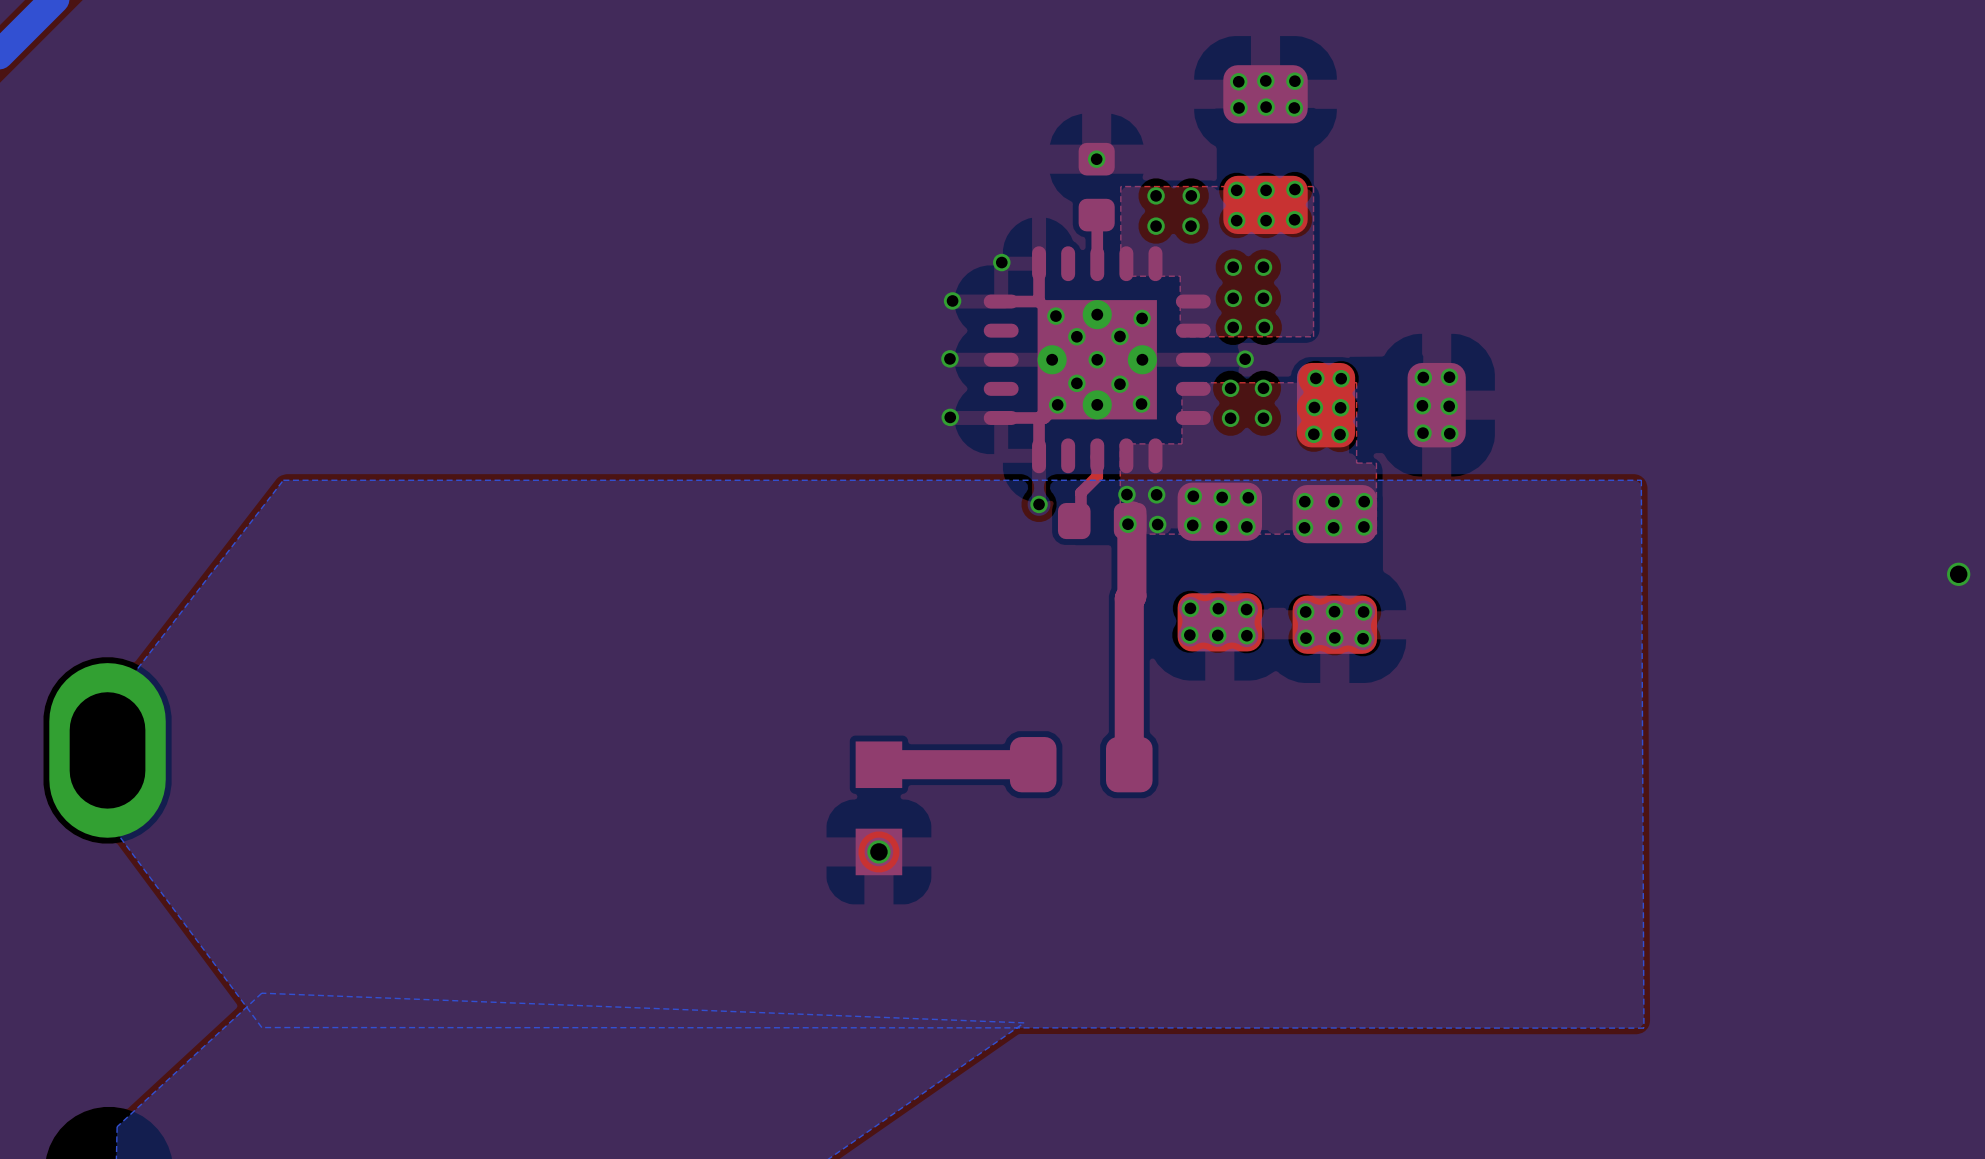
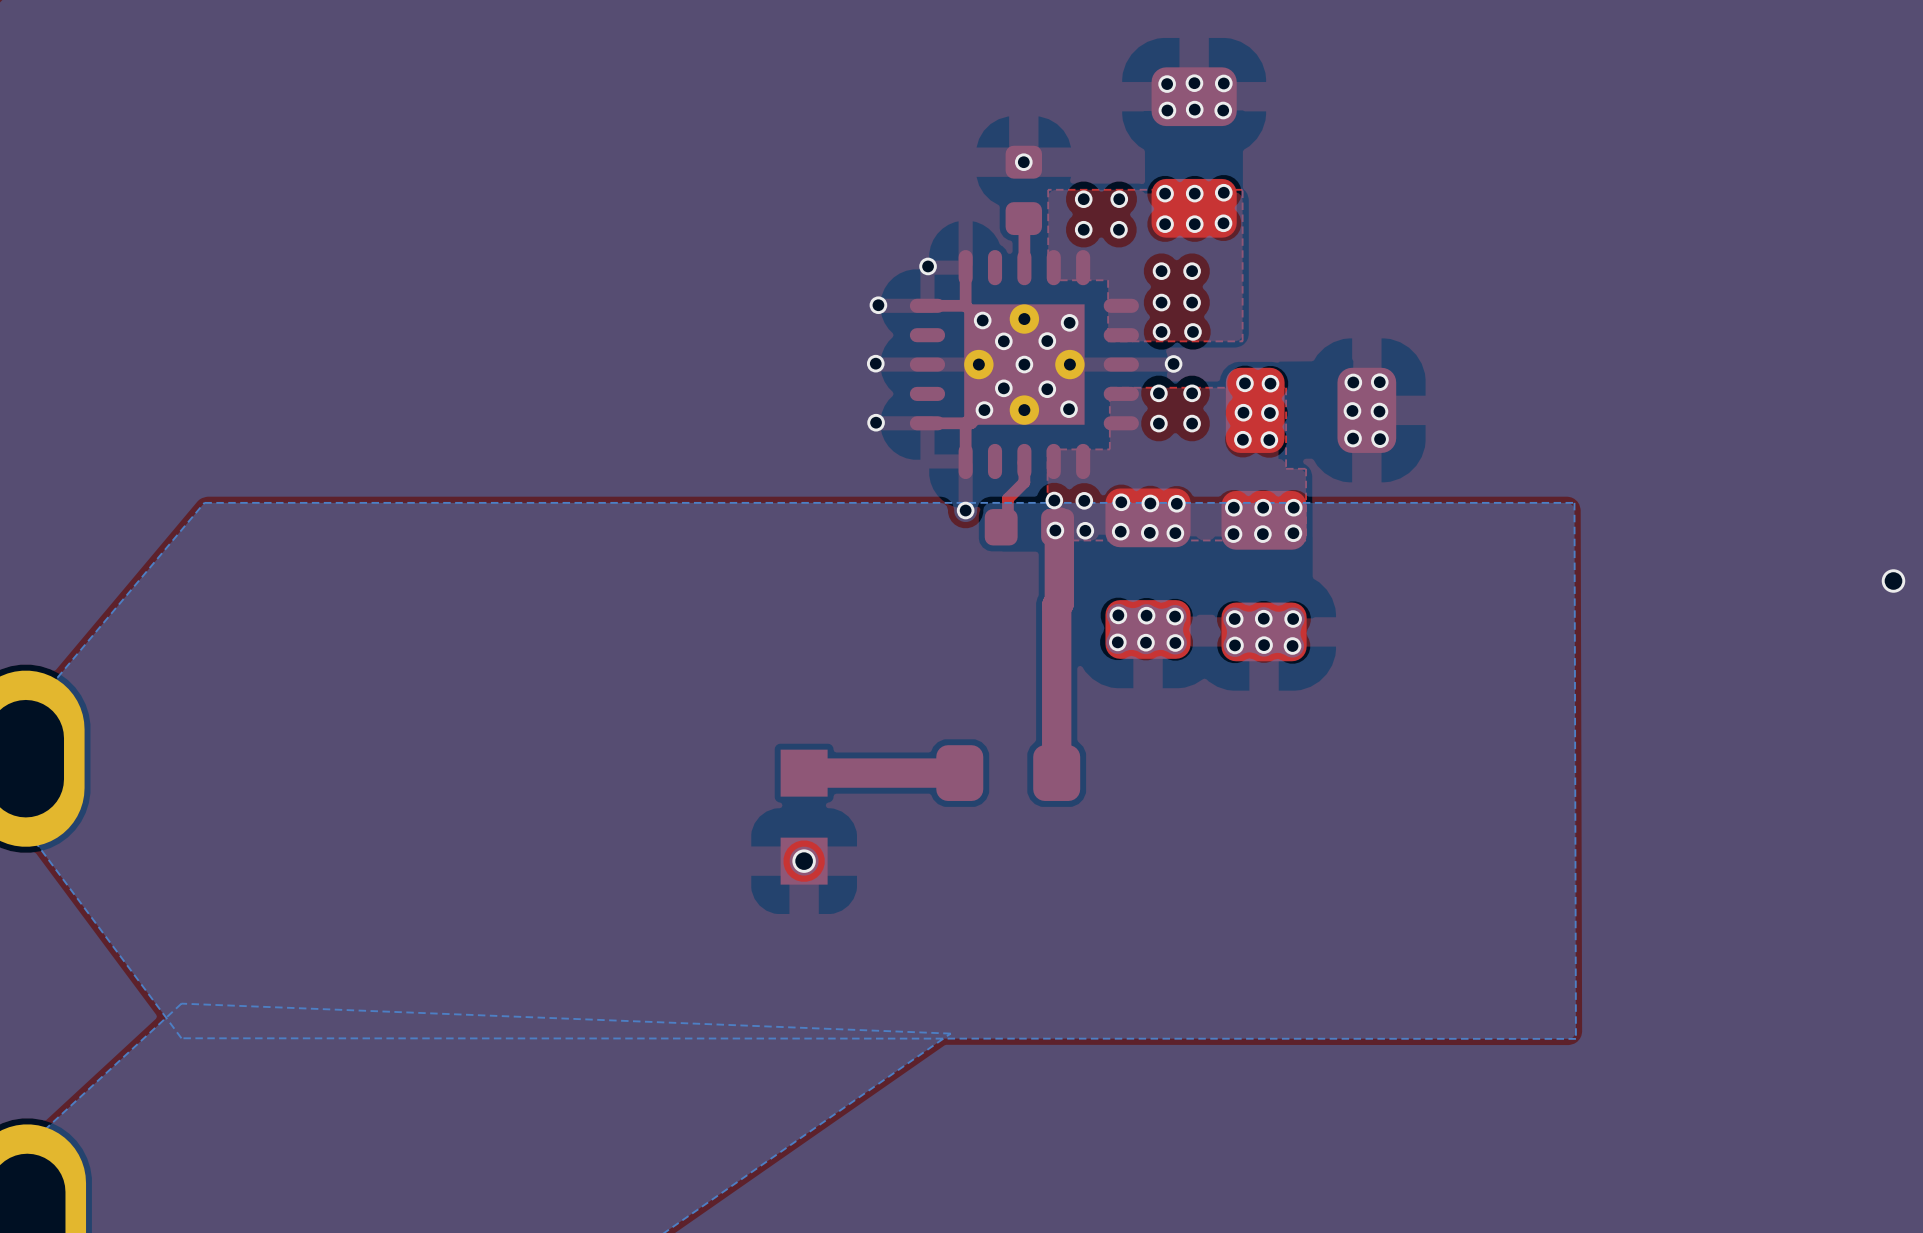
bottom zone outline: (108, 706) (283, 480) (1641, 480) (1643, 1028) -> (26, 714) (204, 502) (1574, 502) (1575, 1038)

